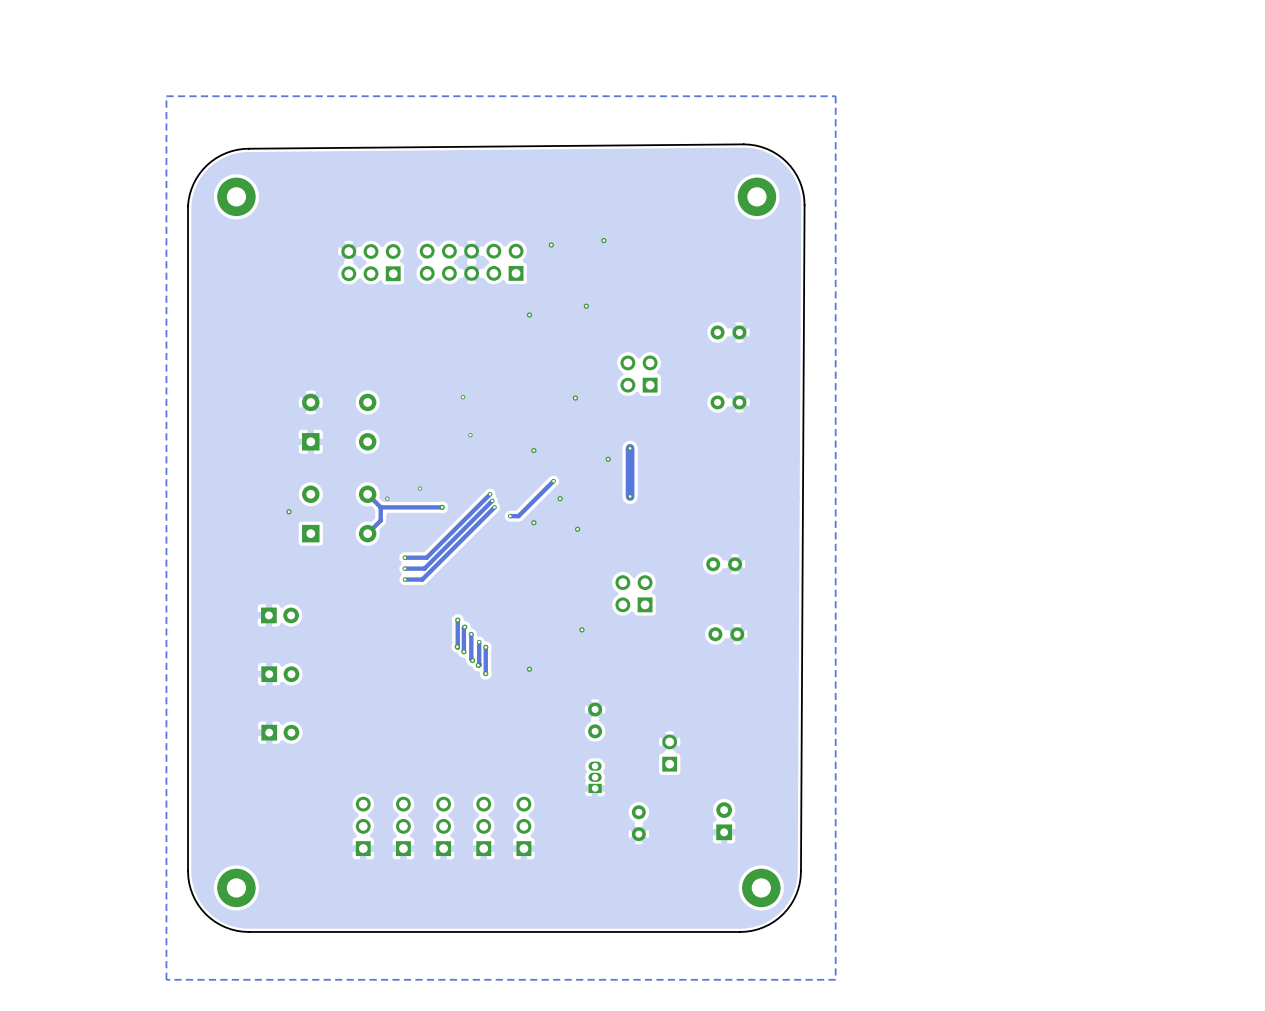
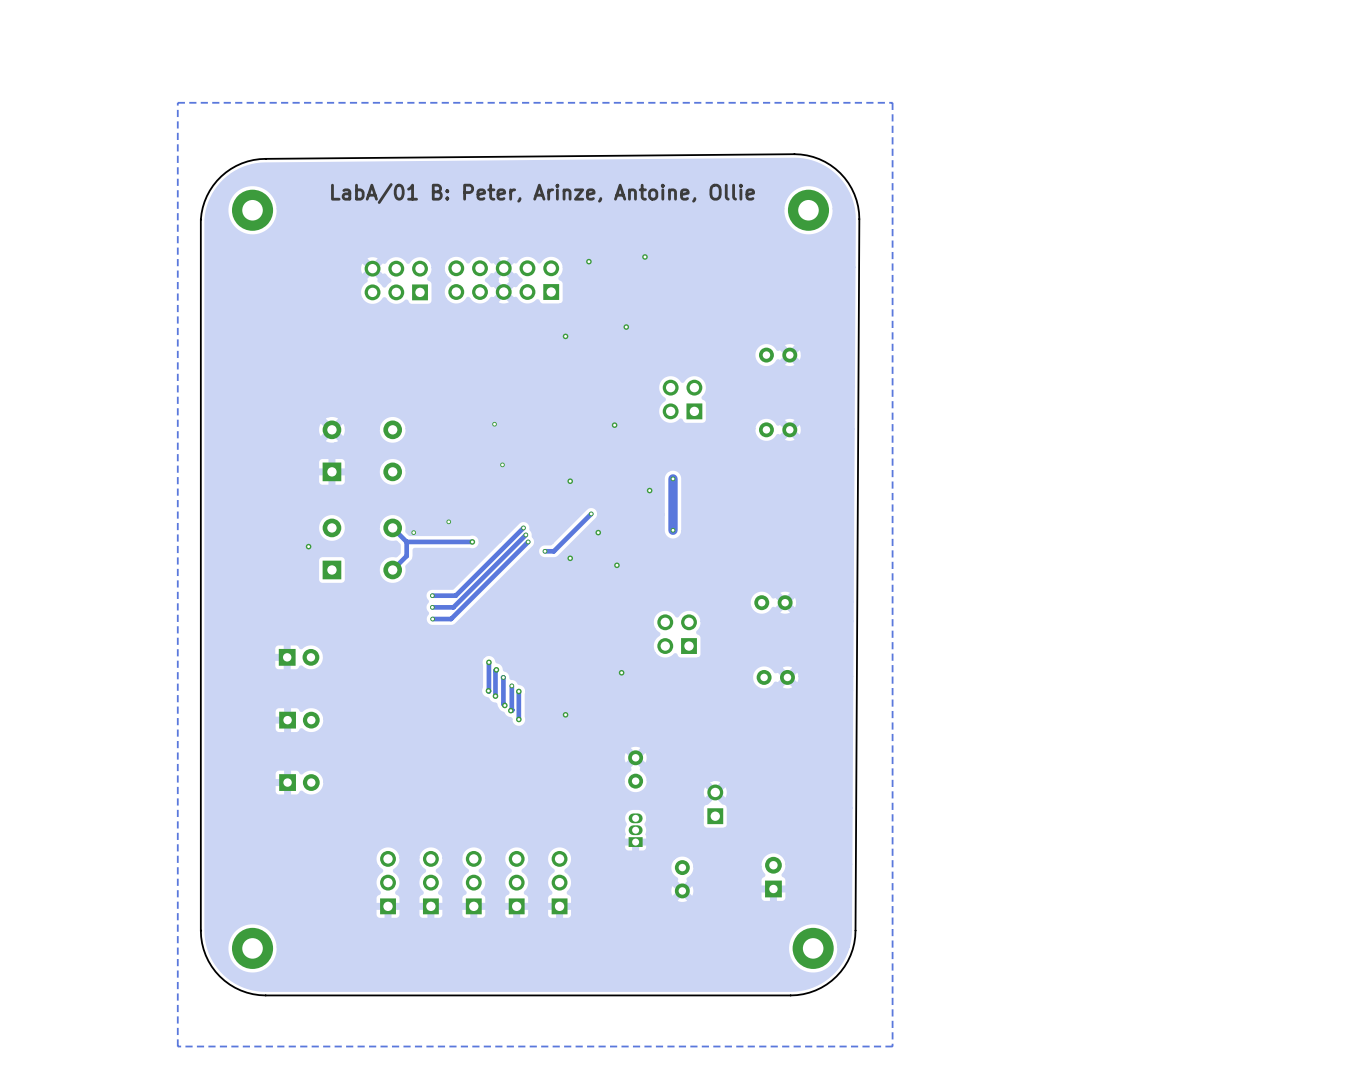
text: none -> LabA/01 B: Peter, Arinze, Antoine, Ollie (543, 193)

